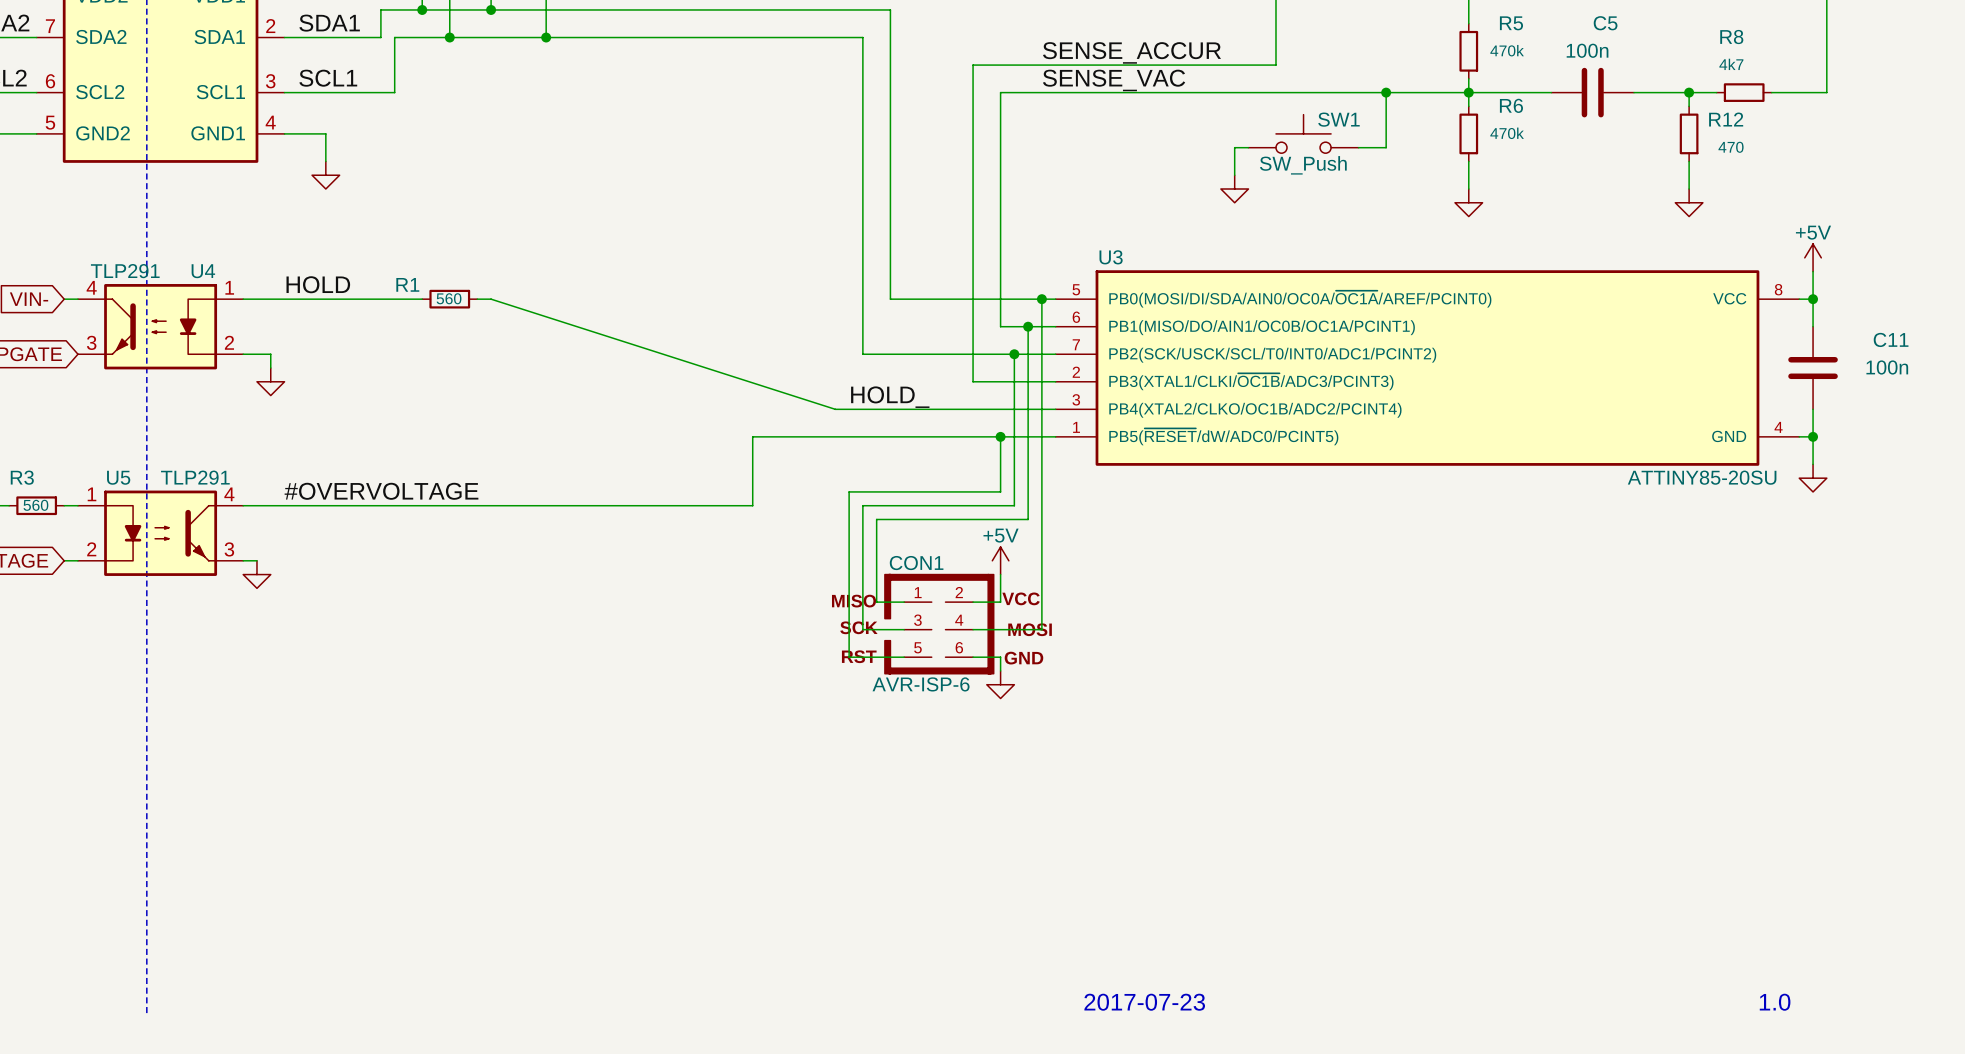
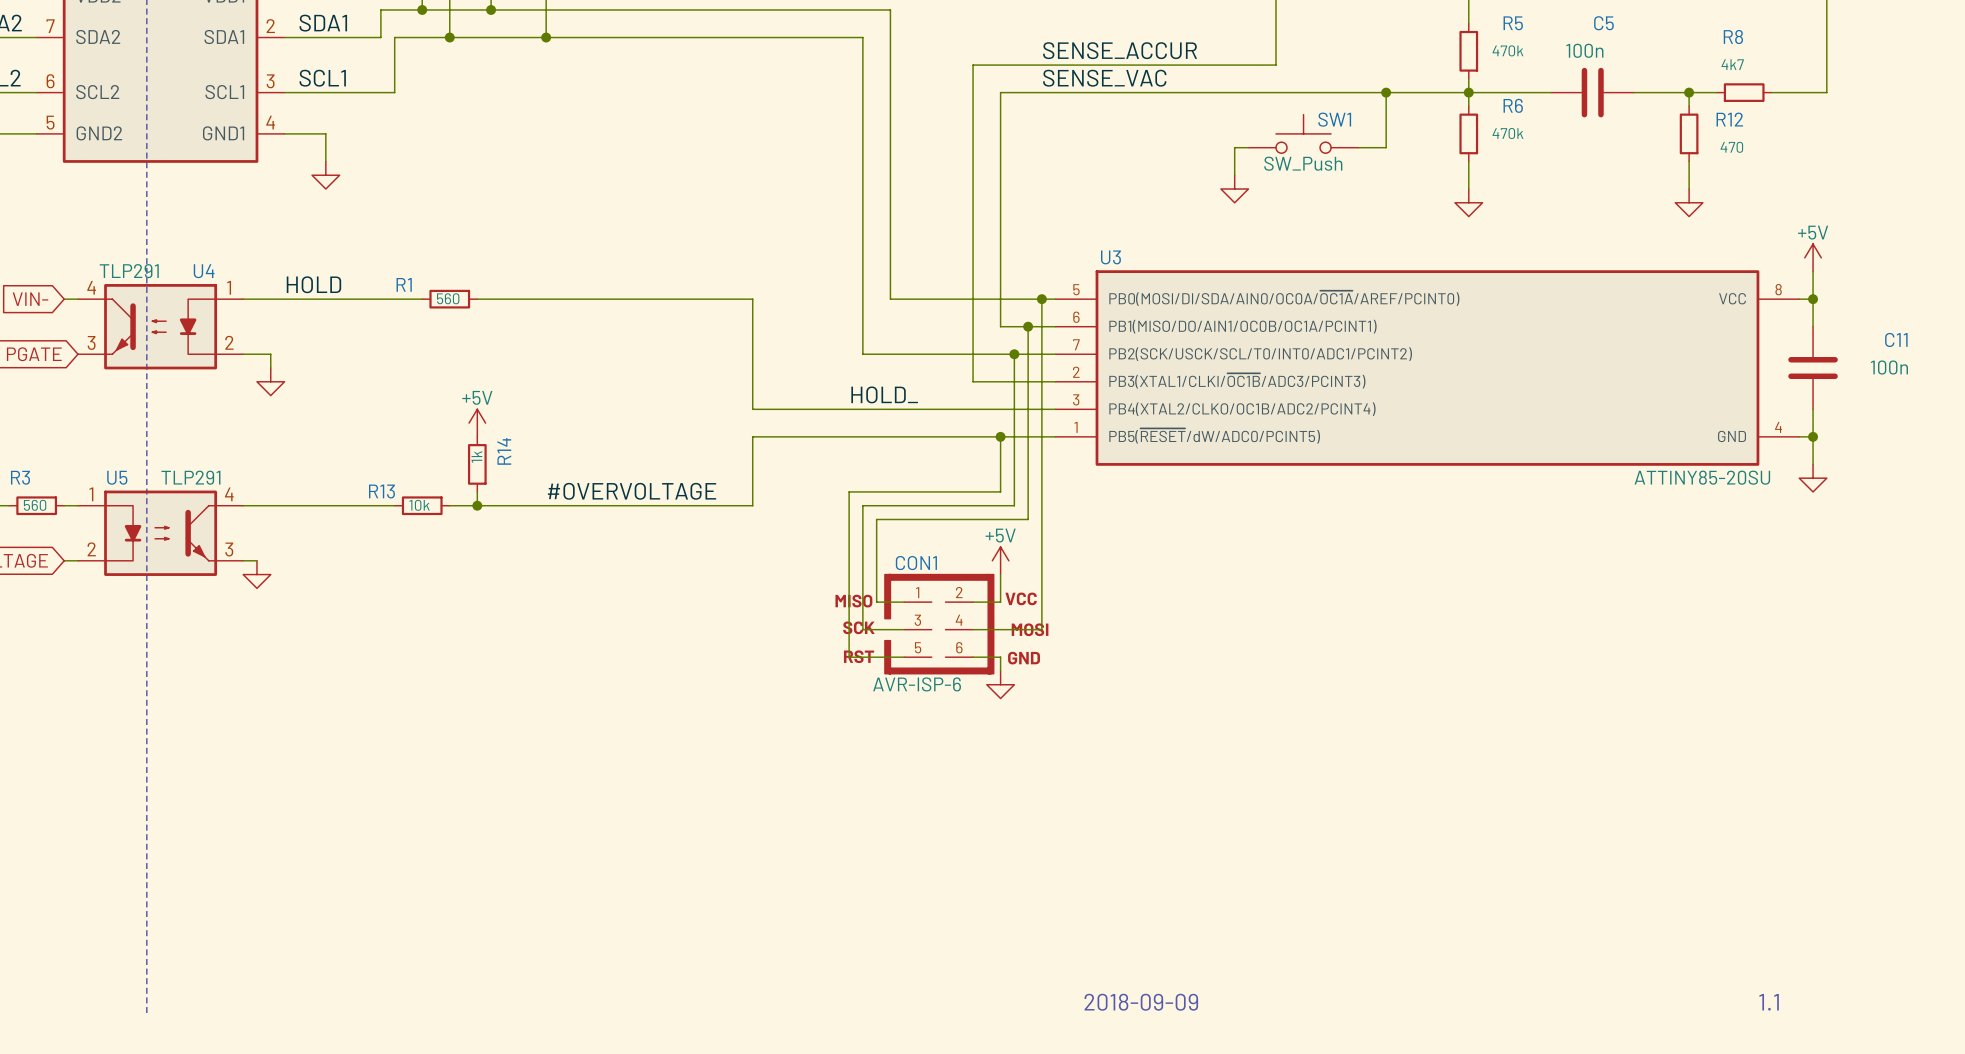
wire: (491, 299) (835, 409) -> (491, 299) (752, 299) (752, 409) (835, 409)
power symbol: none -> +5V (477, 423)
R14: none -> 1k (477, 464)
label position: #OVERVOLTAGE (381, 491) -> #OVERVOLTAGE (632, 491)
wire: none -> (477, 491) (477, 505)
wire: (394, 505) (449, 505) -> none
R13: none -> 10k (422, 505)
junction: none -> (477, 505)
text: 2017-07-23 (1144, 1002) -> 2018-09-09 (1141, 1002)
text: 1.0 (1775, 1002) -> 1.1 (1769, 1002)

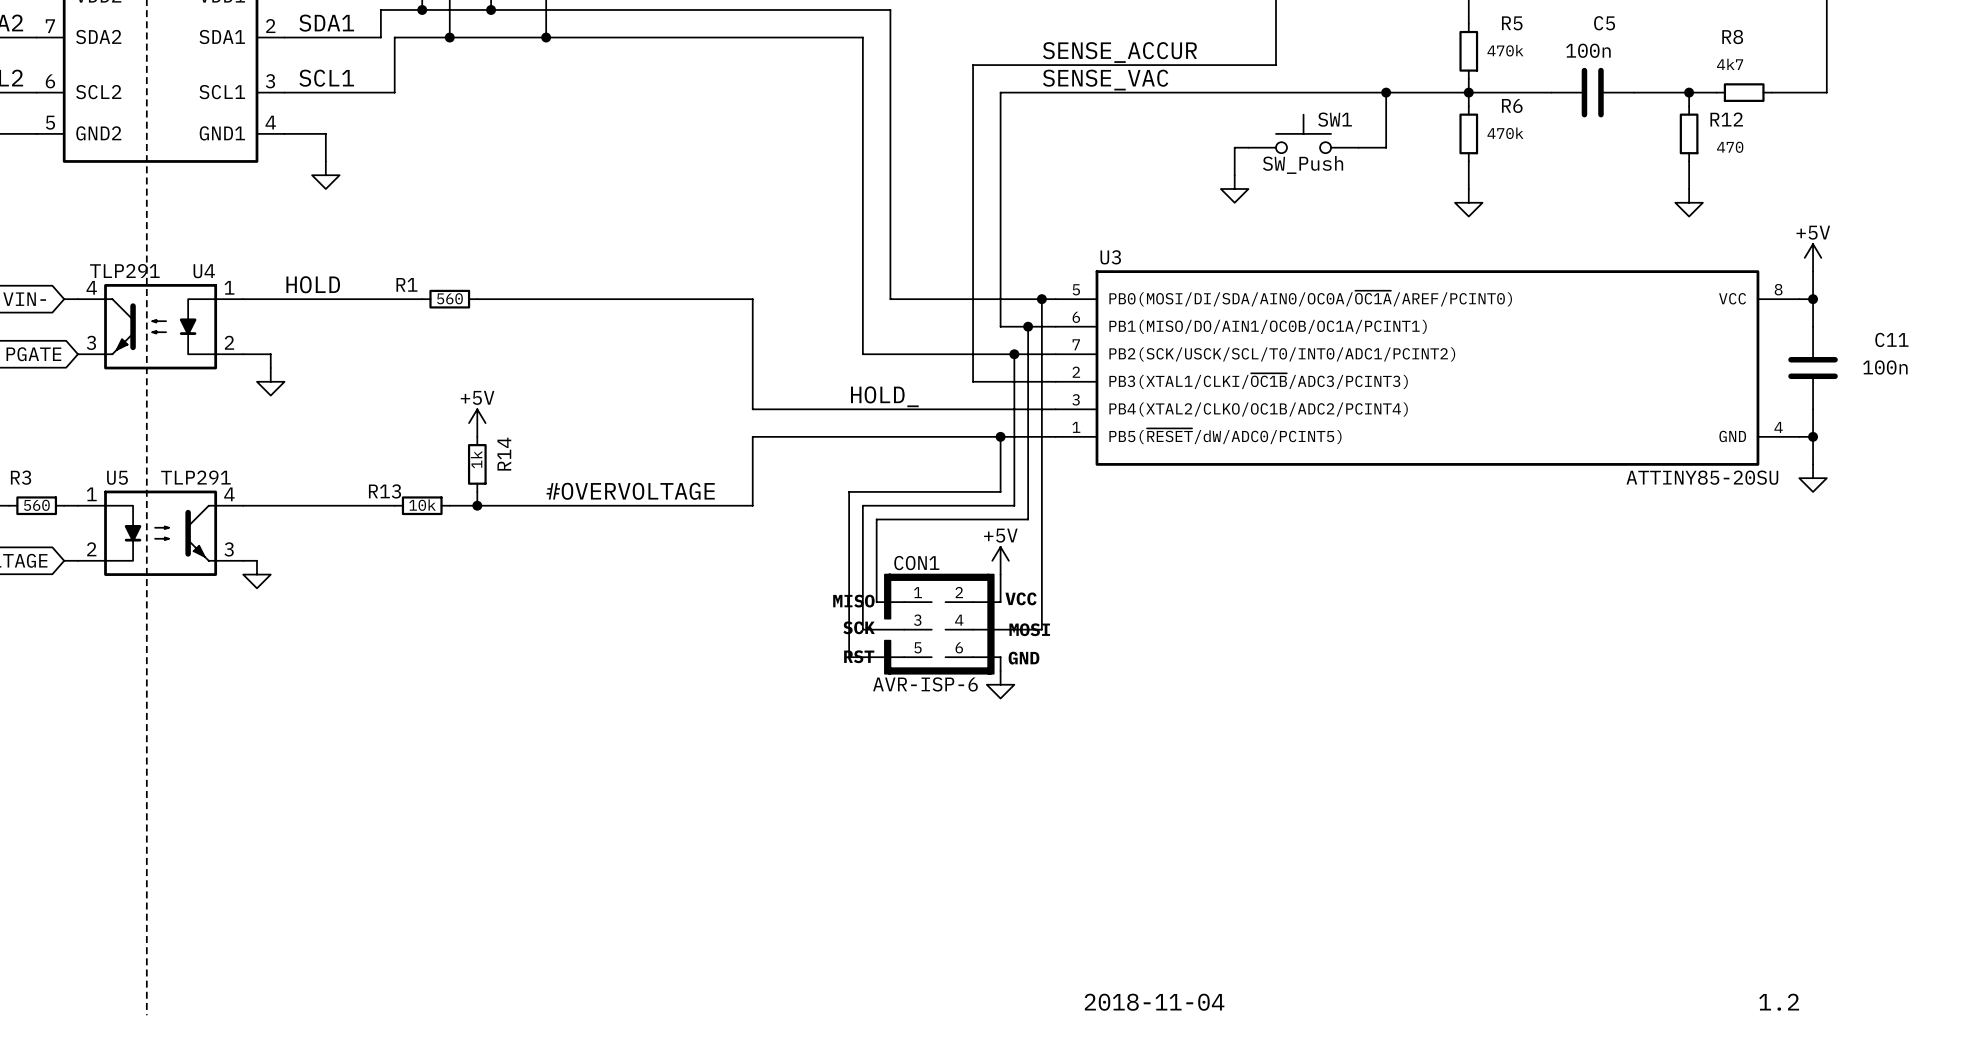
text: 2018-09-09 (1141, 1002) -> 2018-11-04 (1154, 1002)
text: 1.1 (1769, 1002) -> 1.2 (1779, 1002)

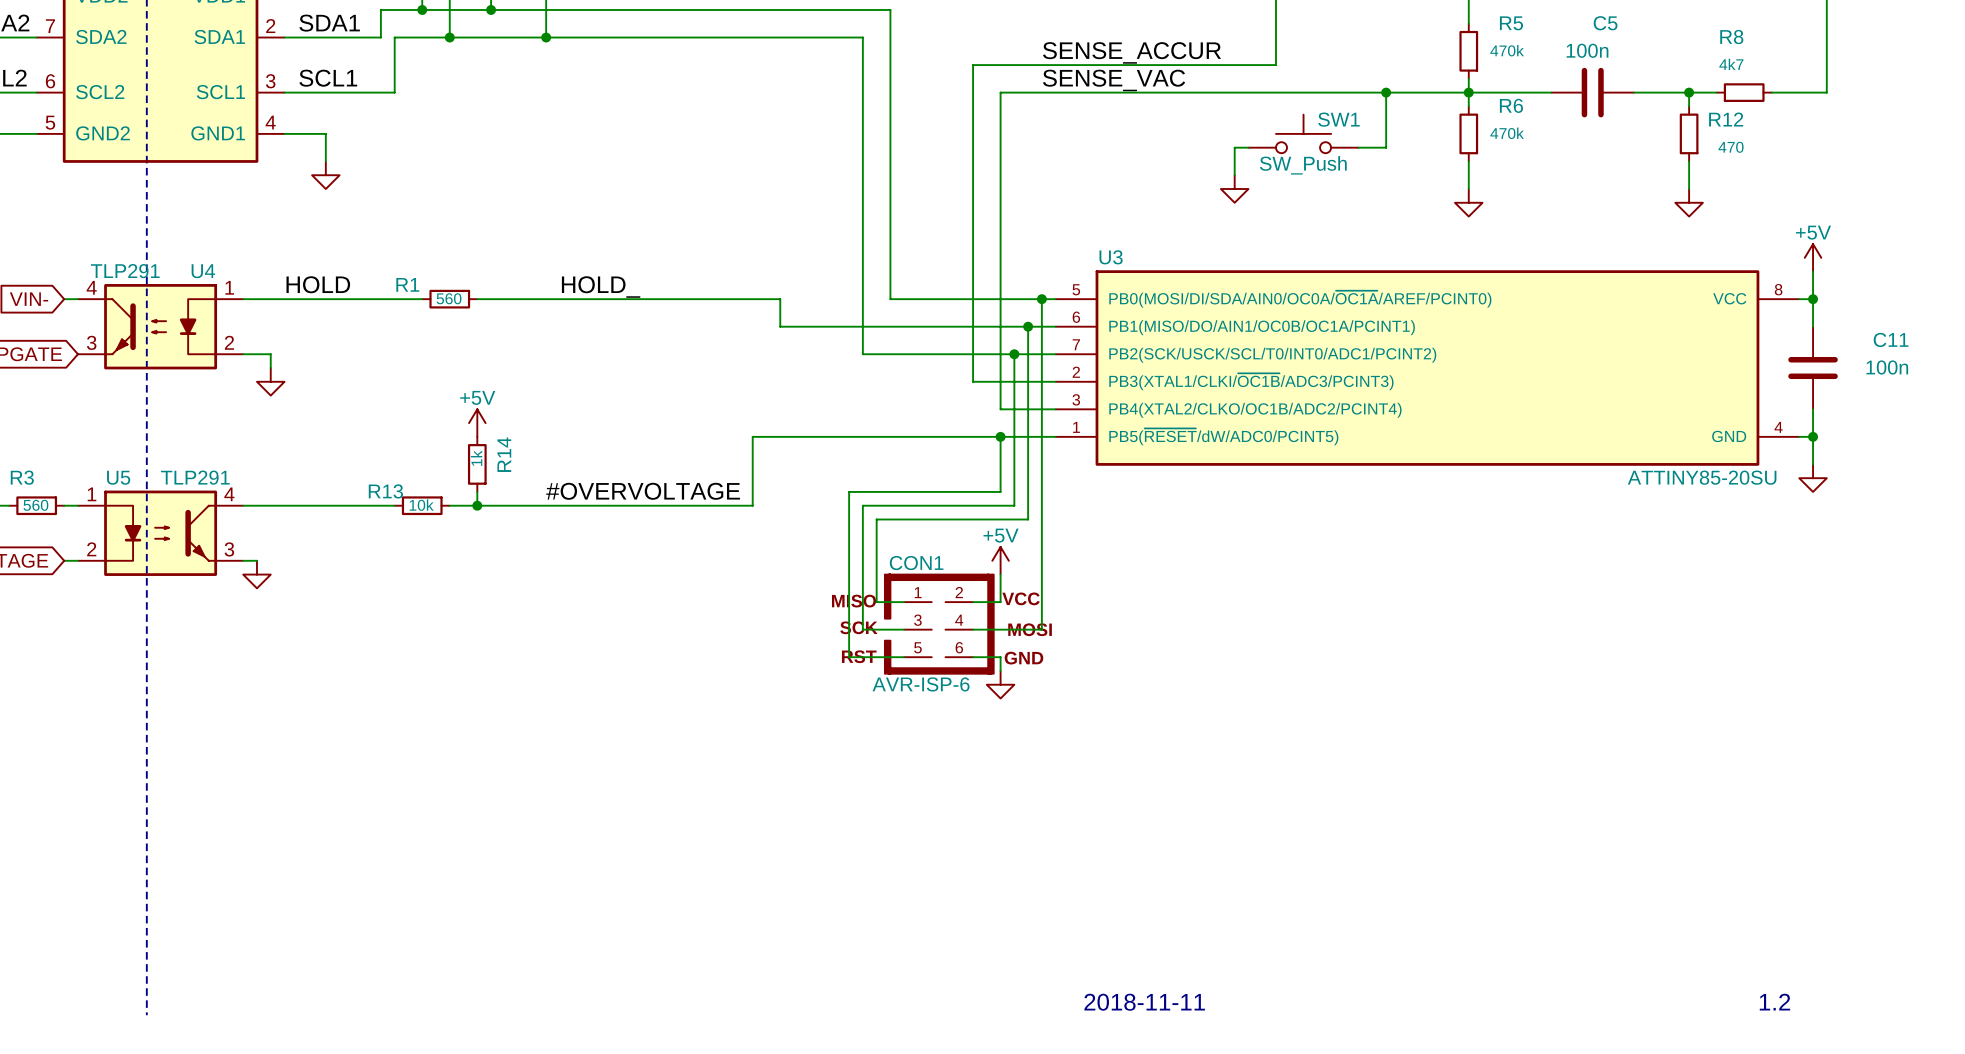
label: none -> HOLD_ (601, 287)
wire: (752, 299) (752, 409) (1000, 409) -> (752, 299) (780, 299) (780, 326) (1000, 326) (1000, 409)
label: HOLD_ (884, 396) -> none
text: 2018-11-04 (1154, 1002) -> 2018-11-11 (1144, 1002)

